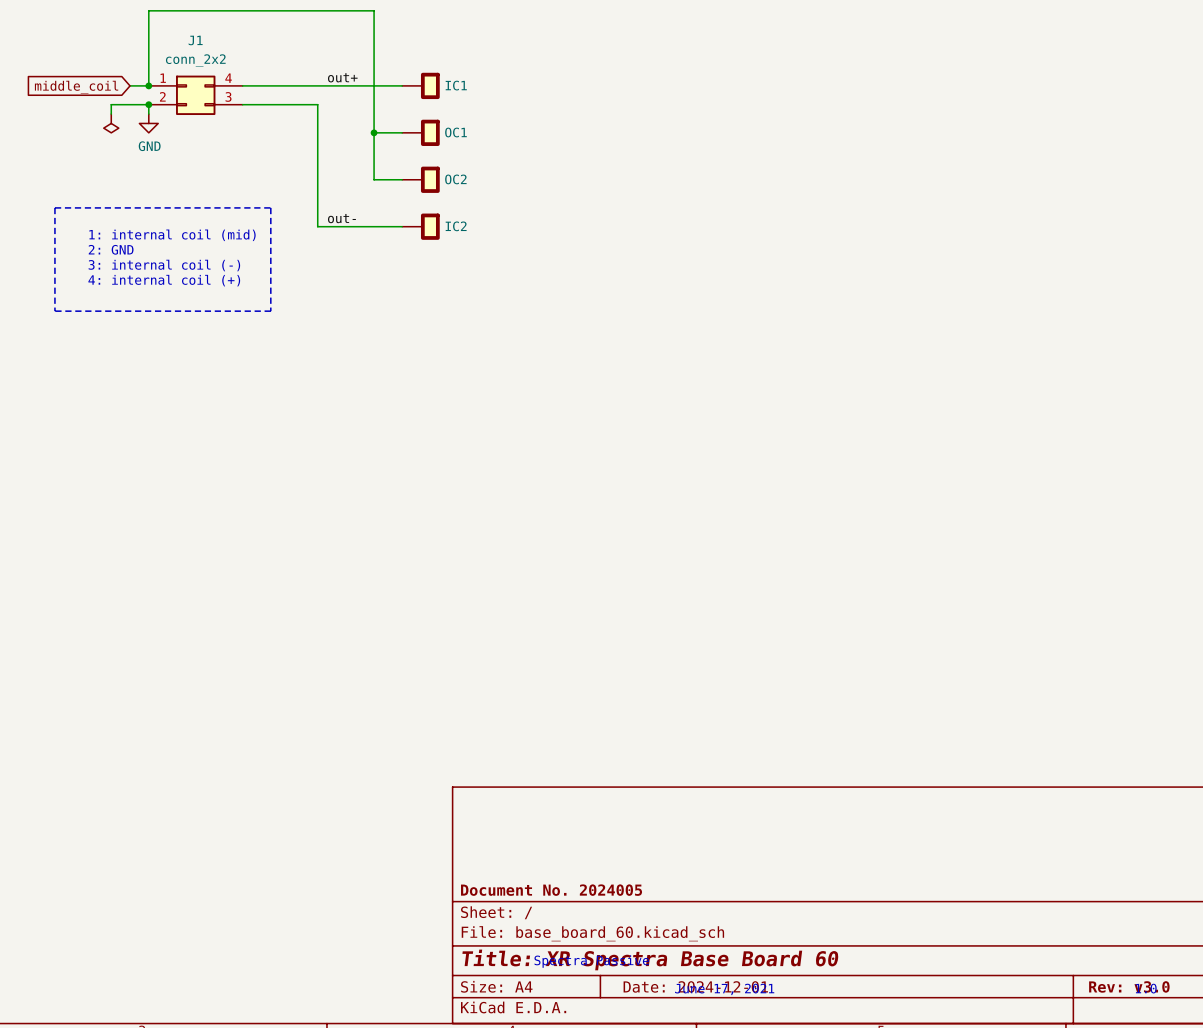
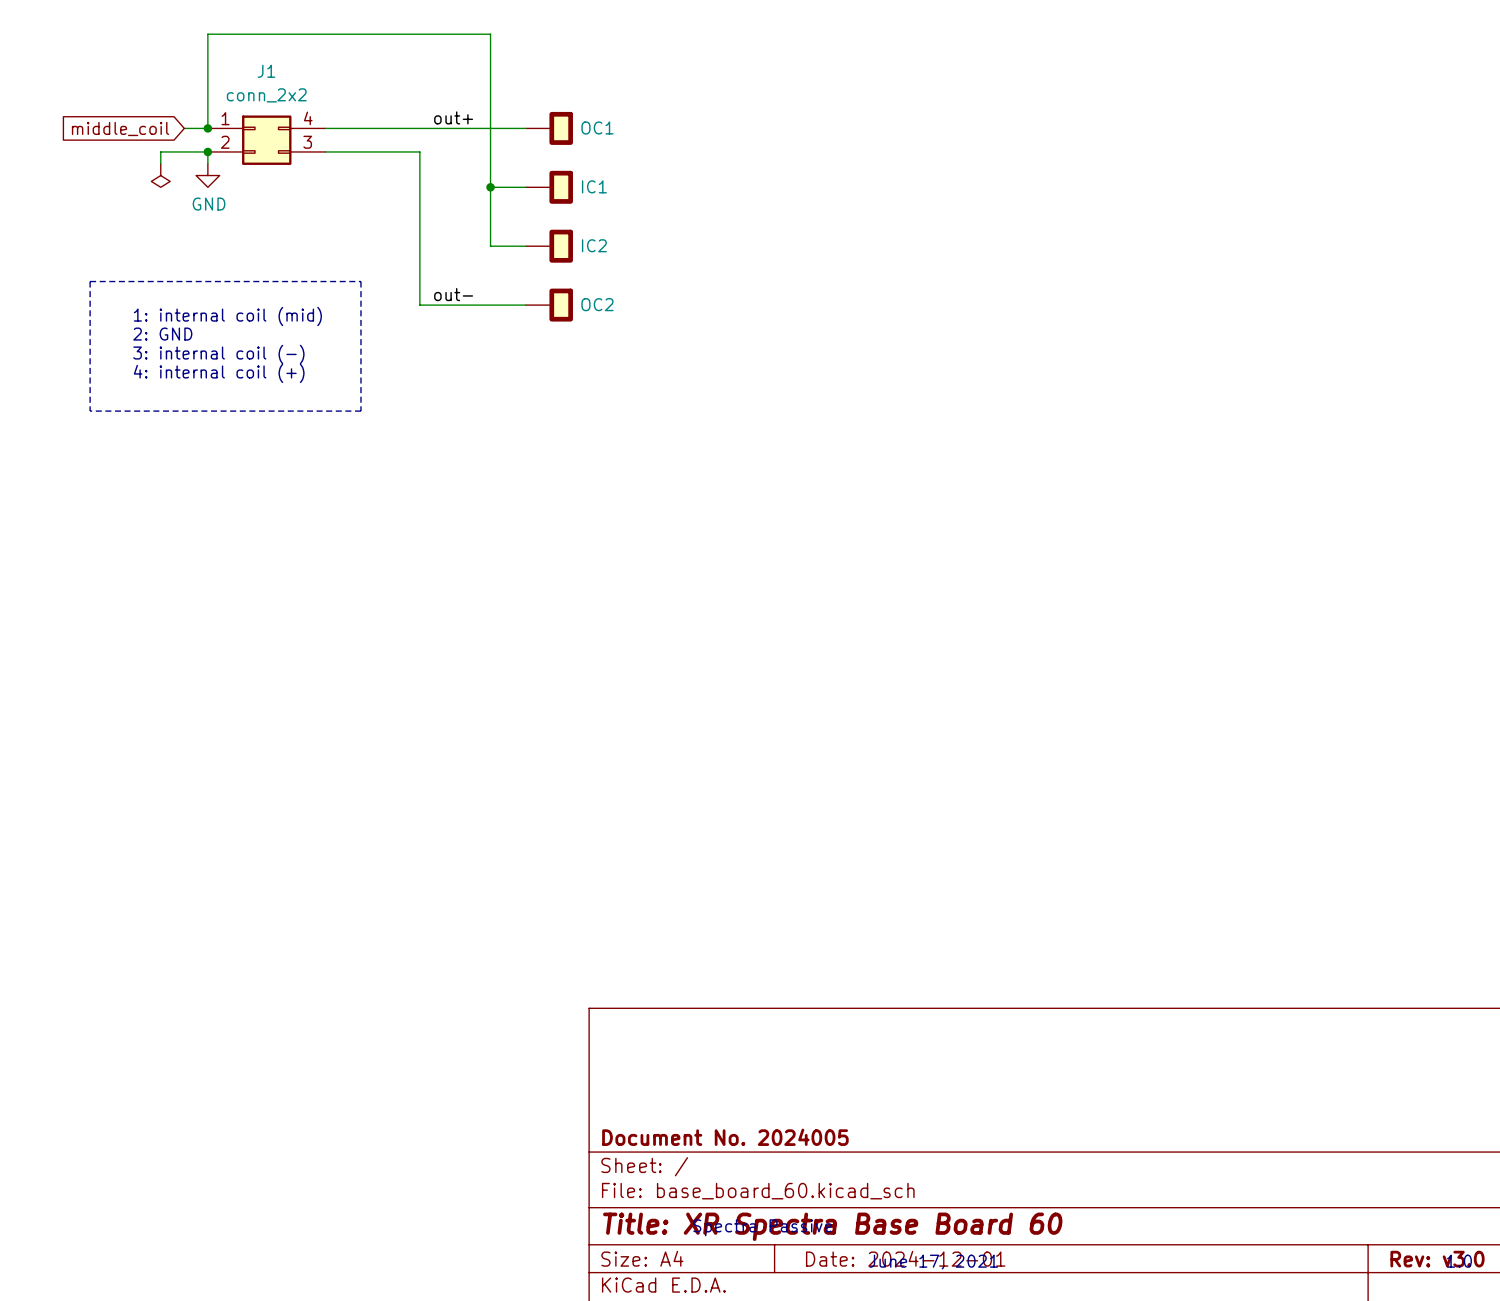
IC1 name: IC1 (456, 85) -> OC1 (597, 127)
OC1 name: OC1 (455, 132) -> IC1 (594, 186)
OC2 name: OC2 (455, 179) -> IC2 (594, 245)
IC2 name: IC2 (456, 226) -> OC2 (597, 304)

